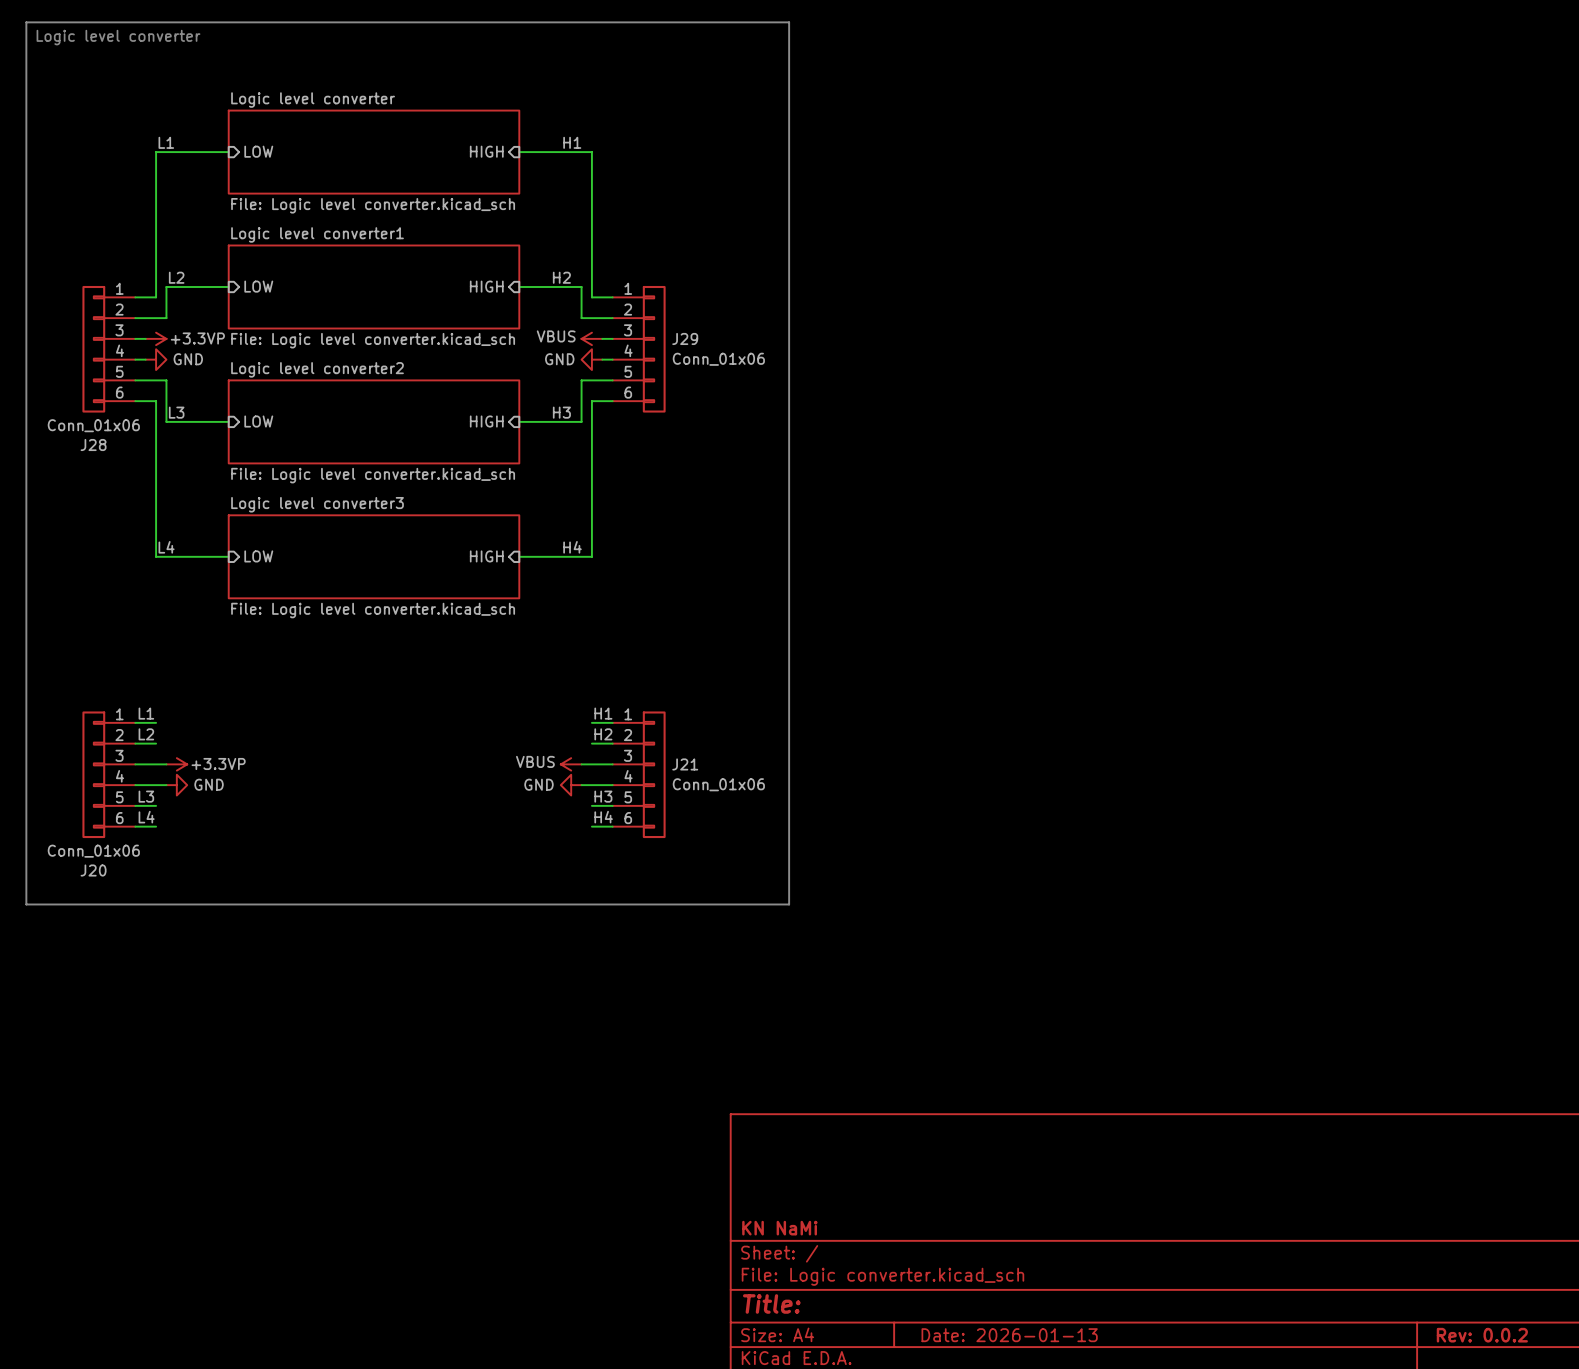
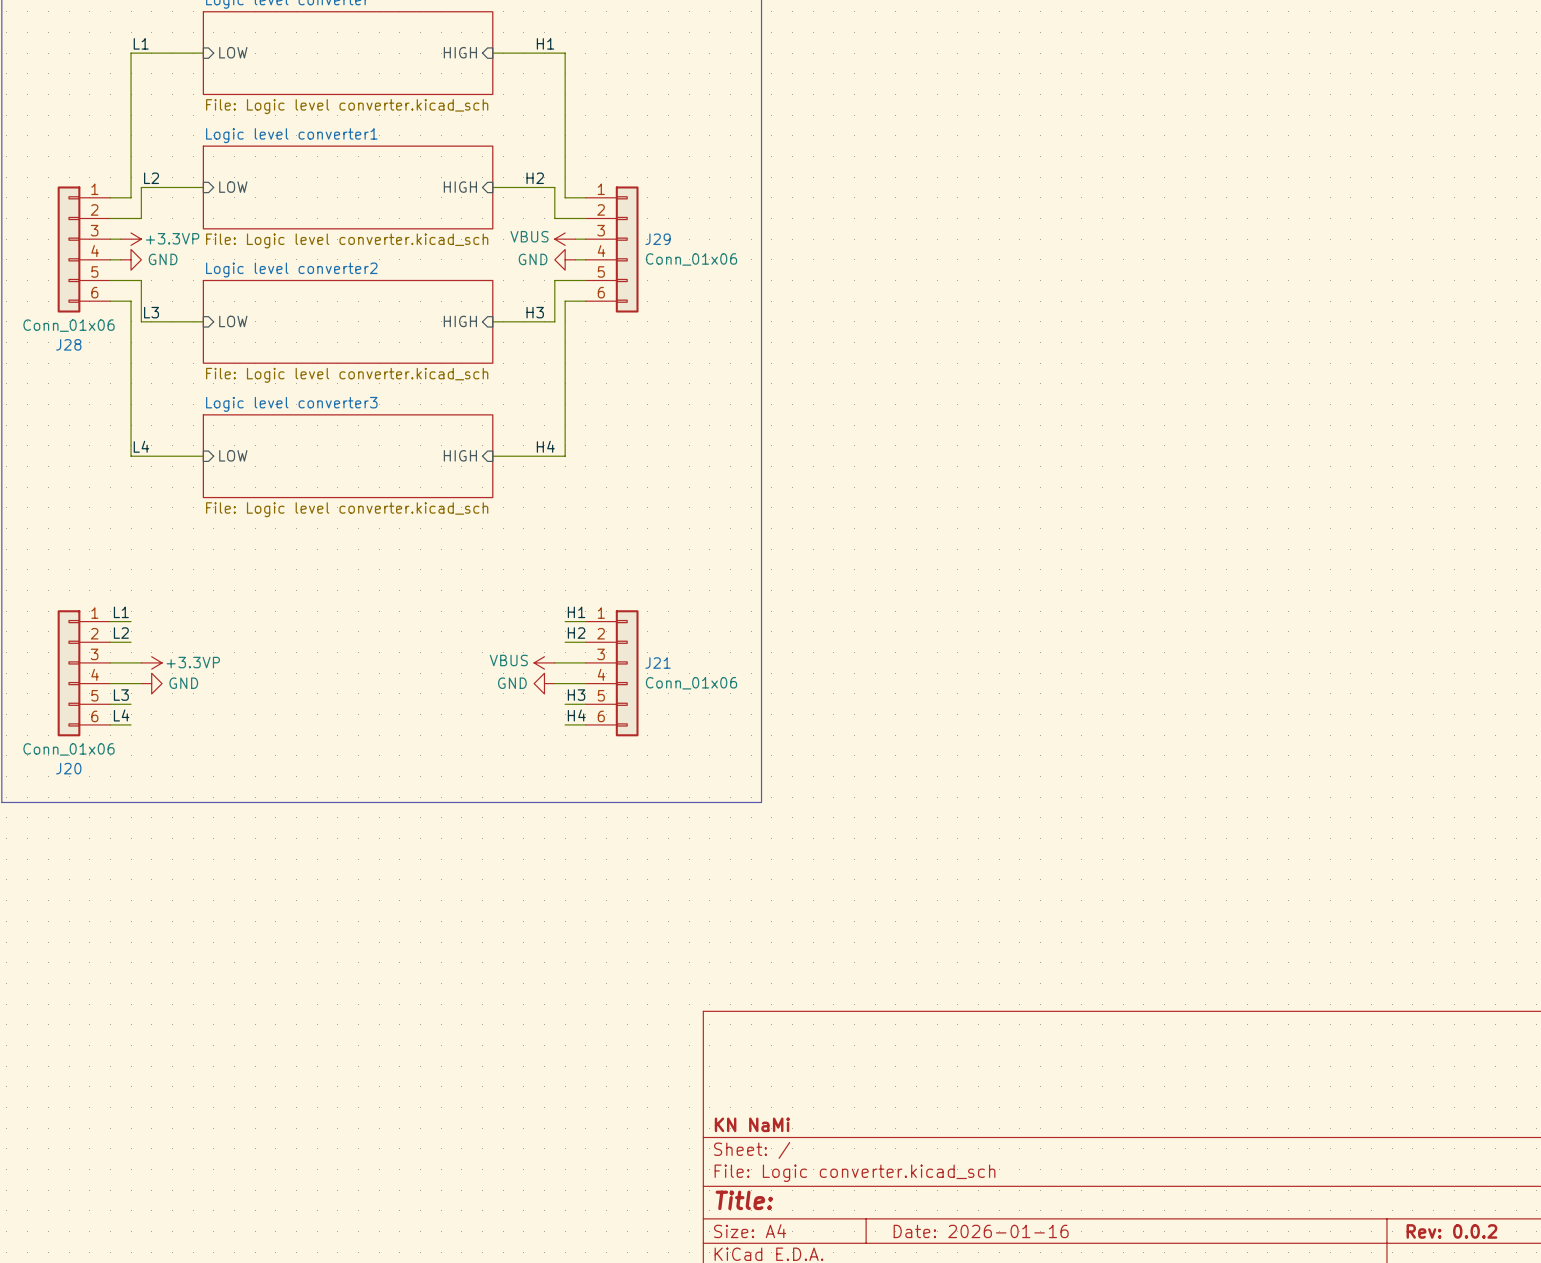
title block: Date: 2026-01-13 (1009, 1335) -> Date: 2026-01-16 (981, 1231)

